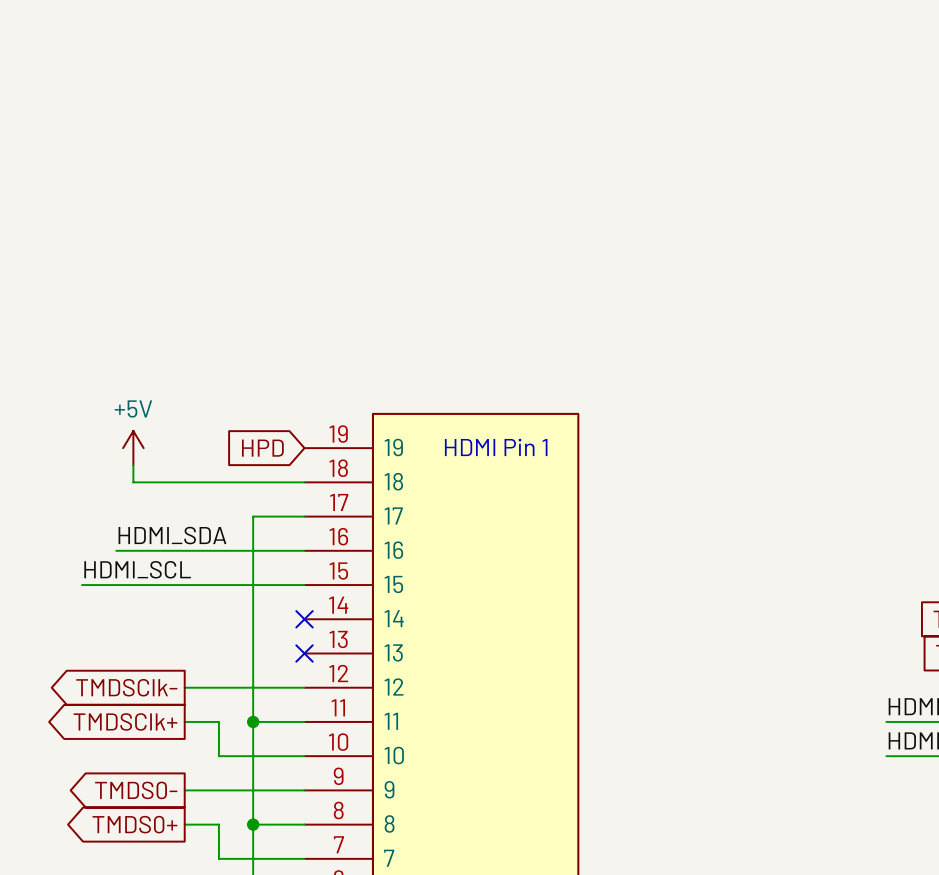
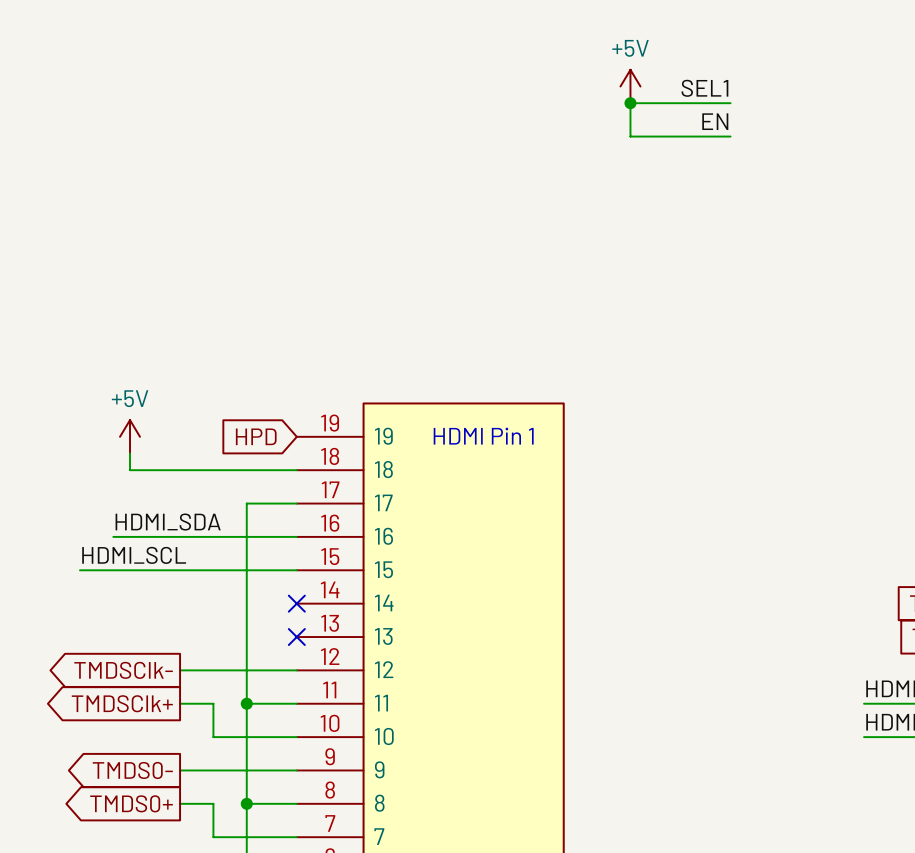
power symbol: none -> +5V (630, 86)
label: none -> SEL1 (704, 88)
junction: none -> (630, 103)
wire: none -> (730, 103) (630, 103) (630, 136) (730, 136)
label: none -> EN (715, 121)

